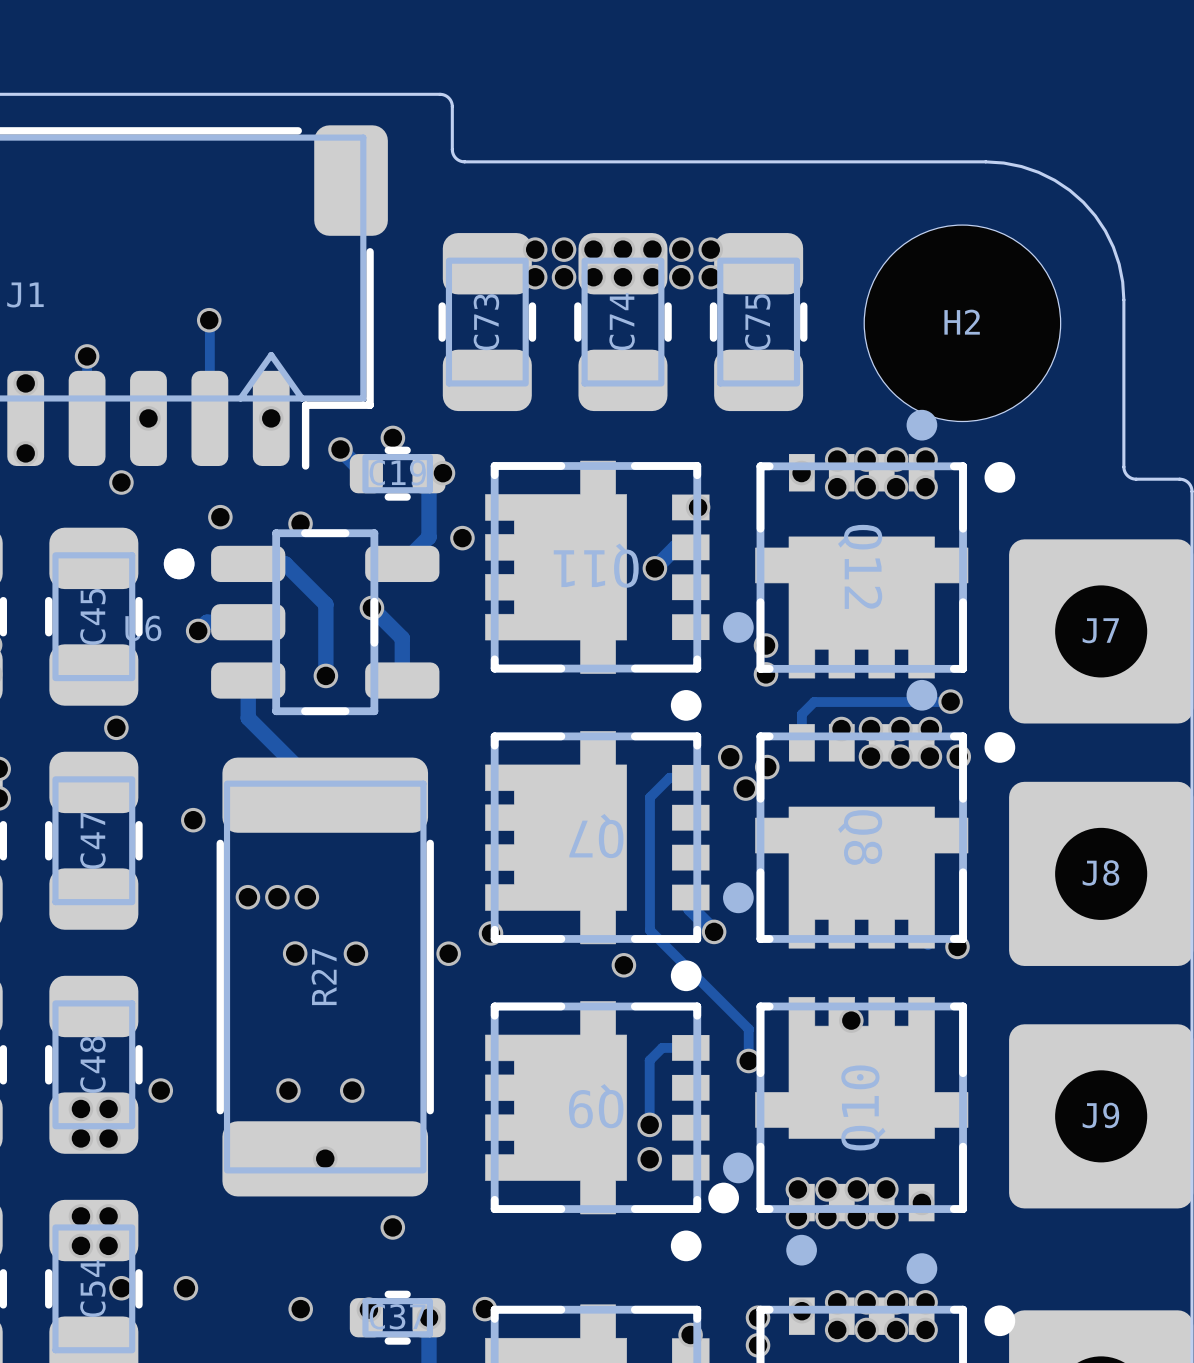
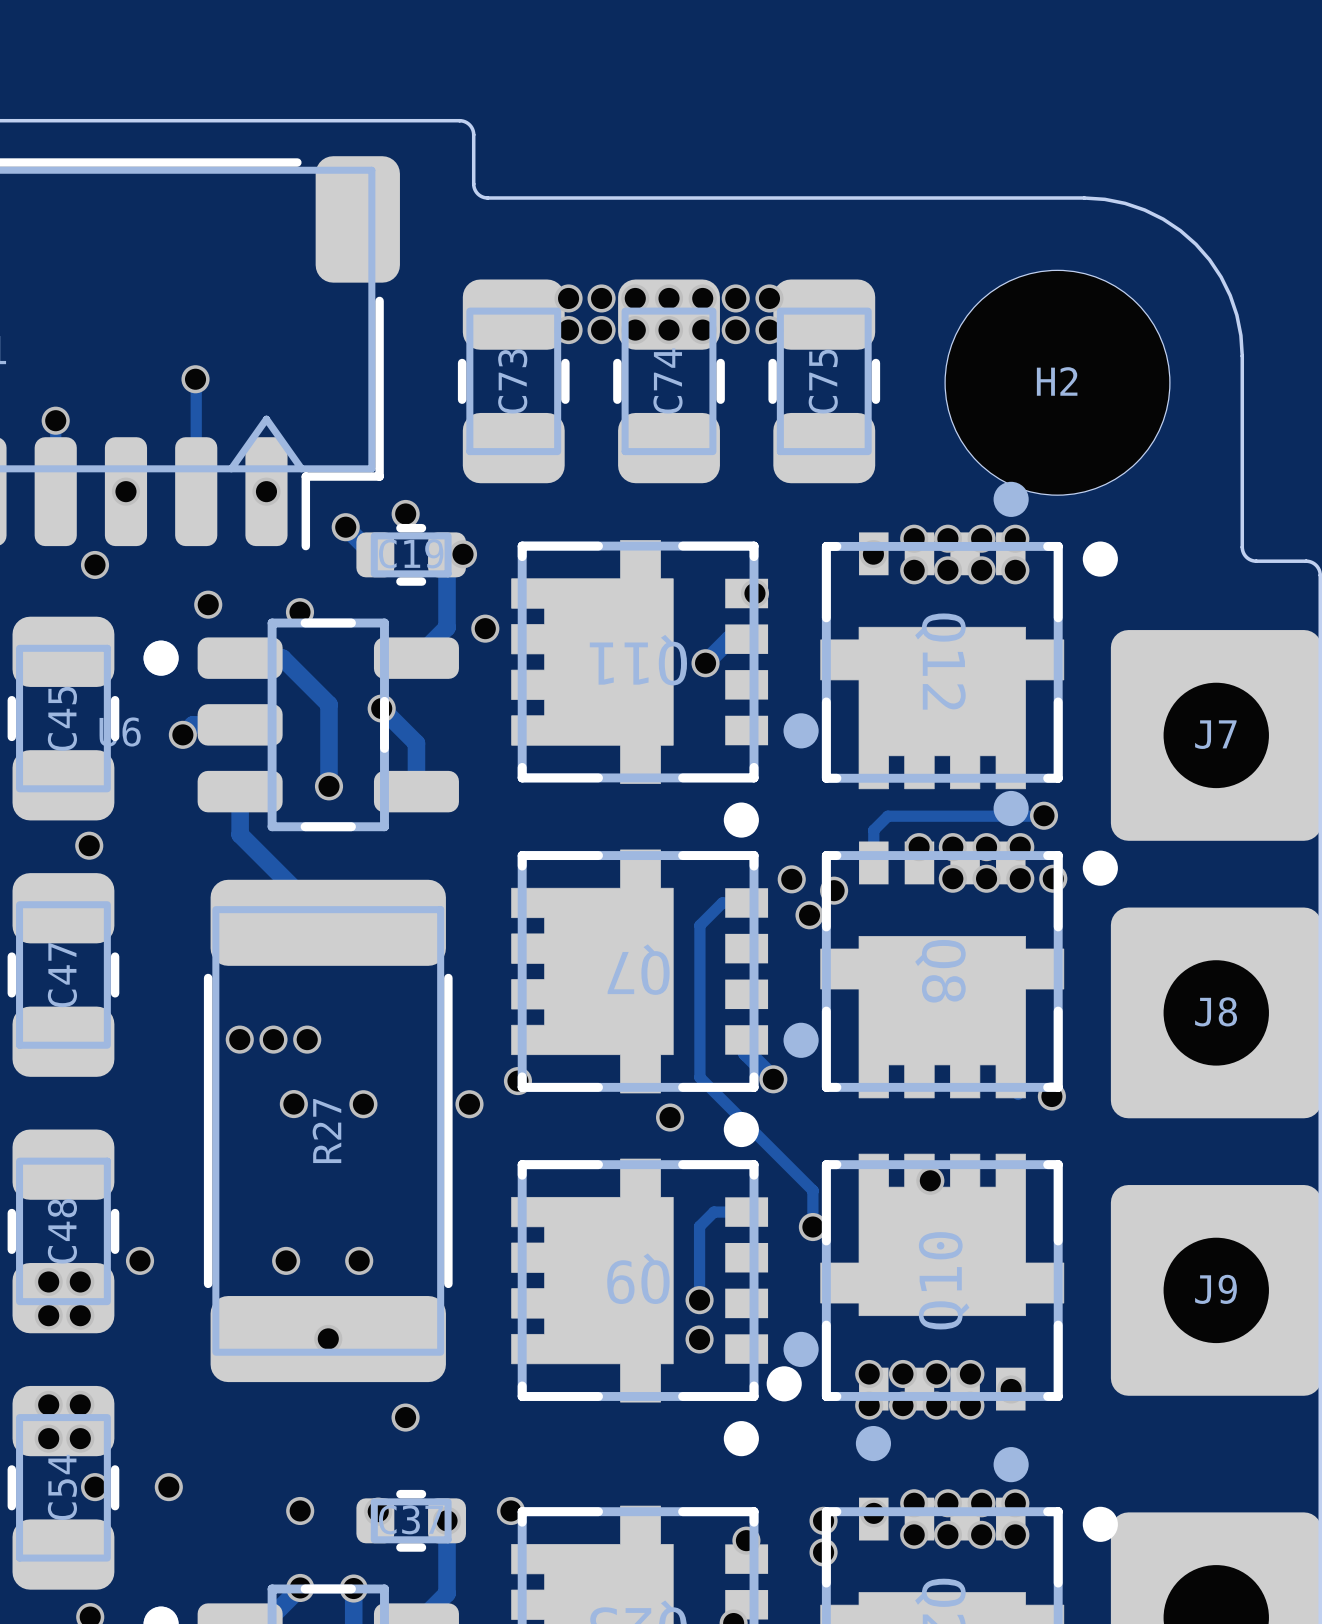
via: (766, 645) -> none
via: (766, 674) -> none
via: (193, 820) -> none

